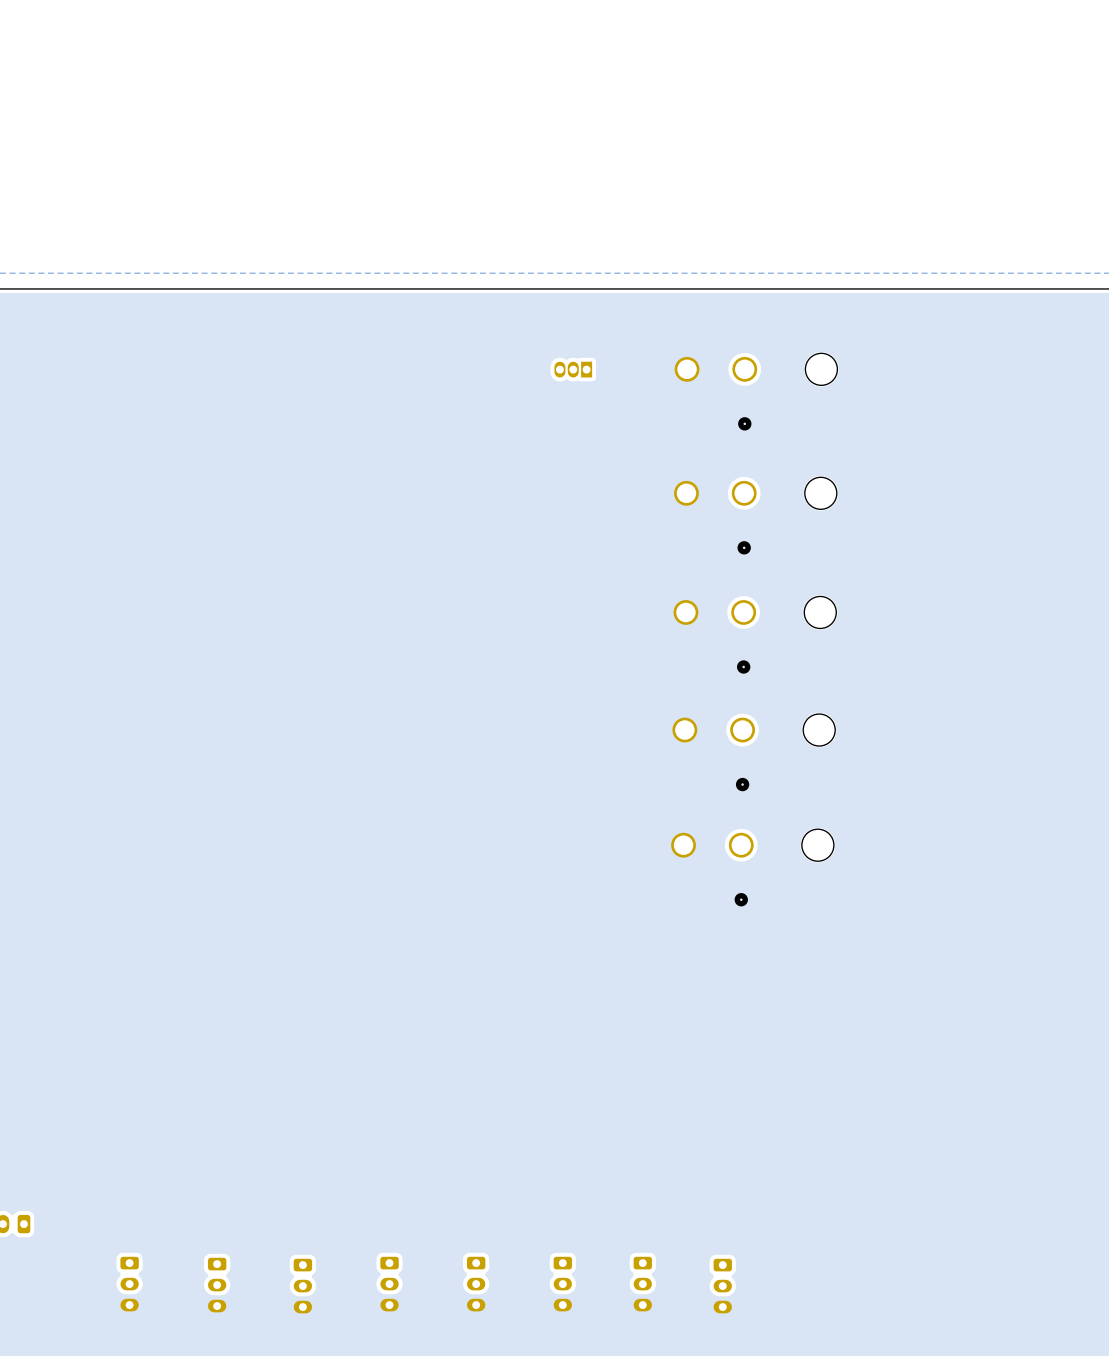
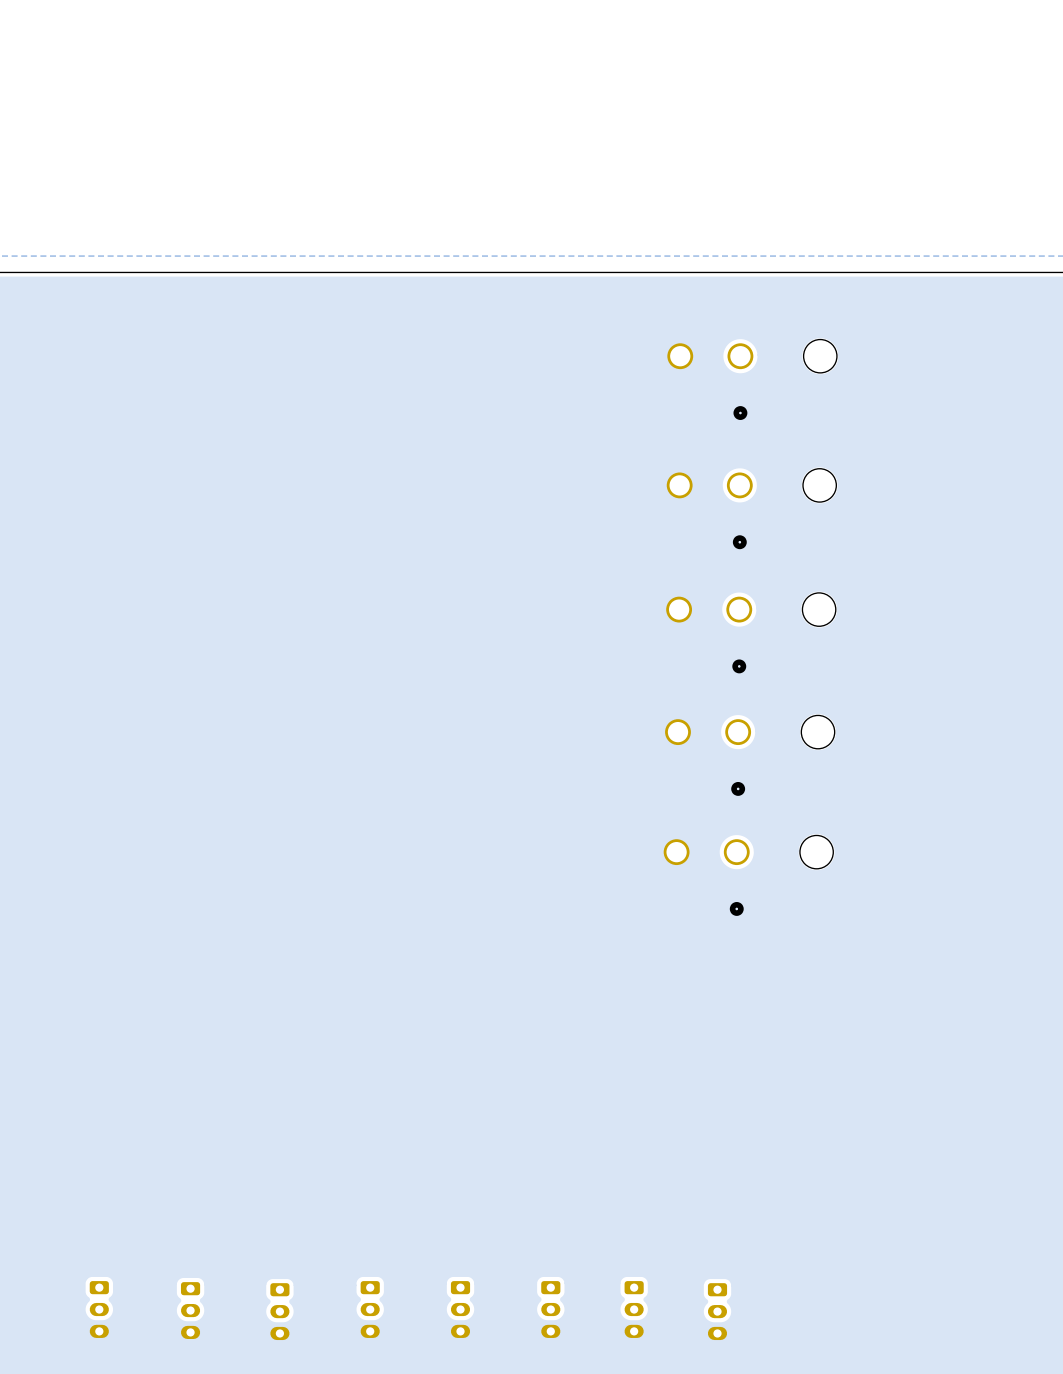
part: (573, 369) -> none

